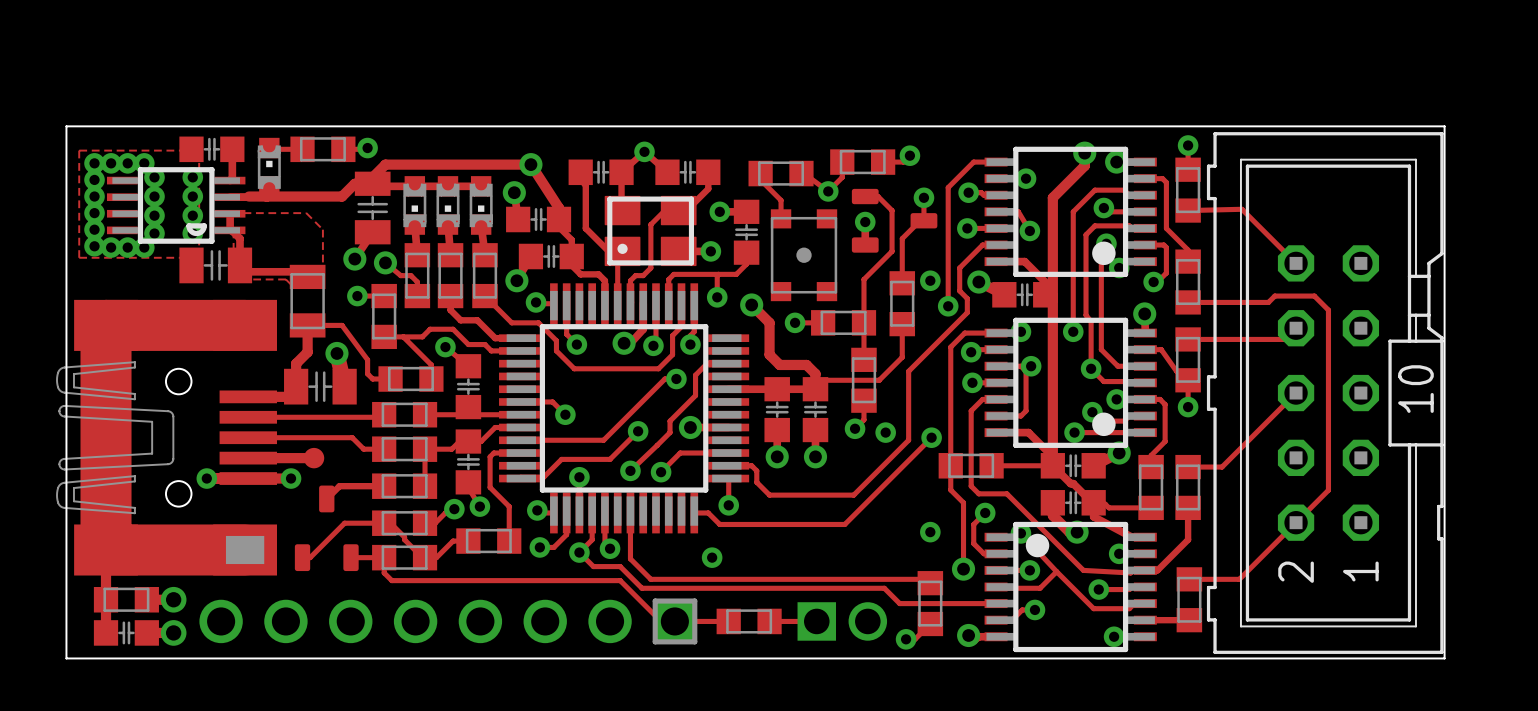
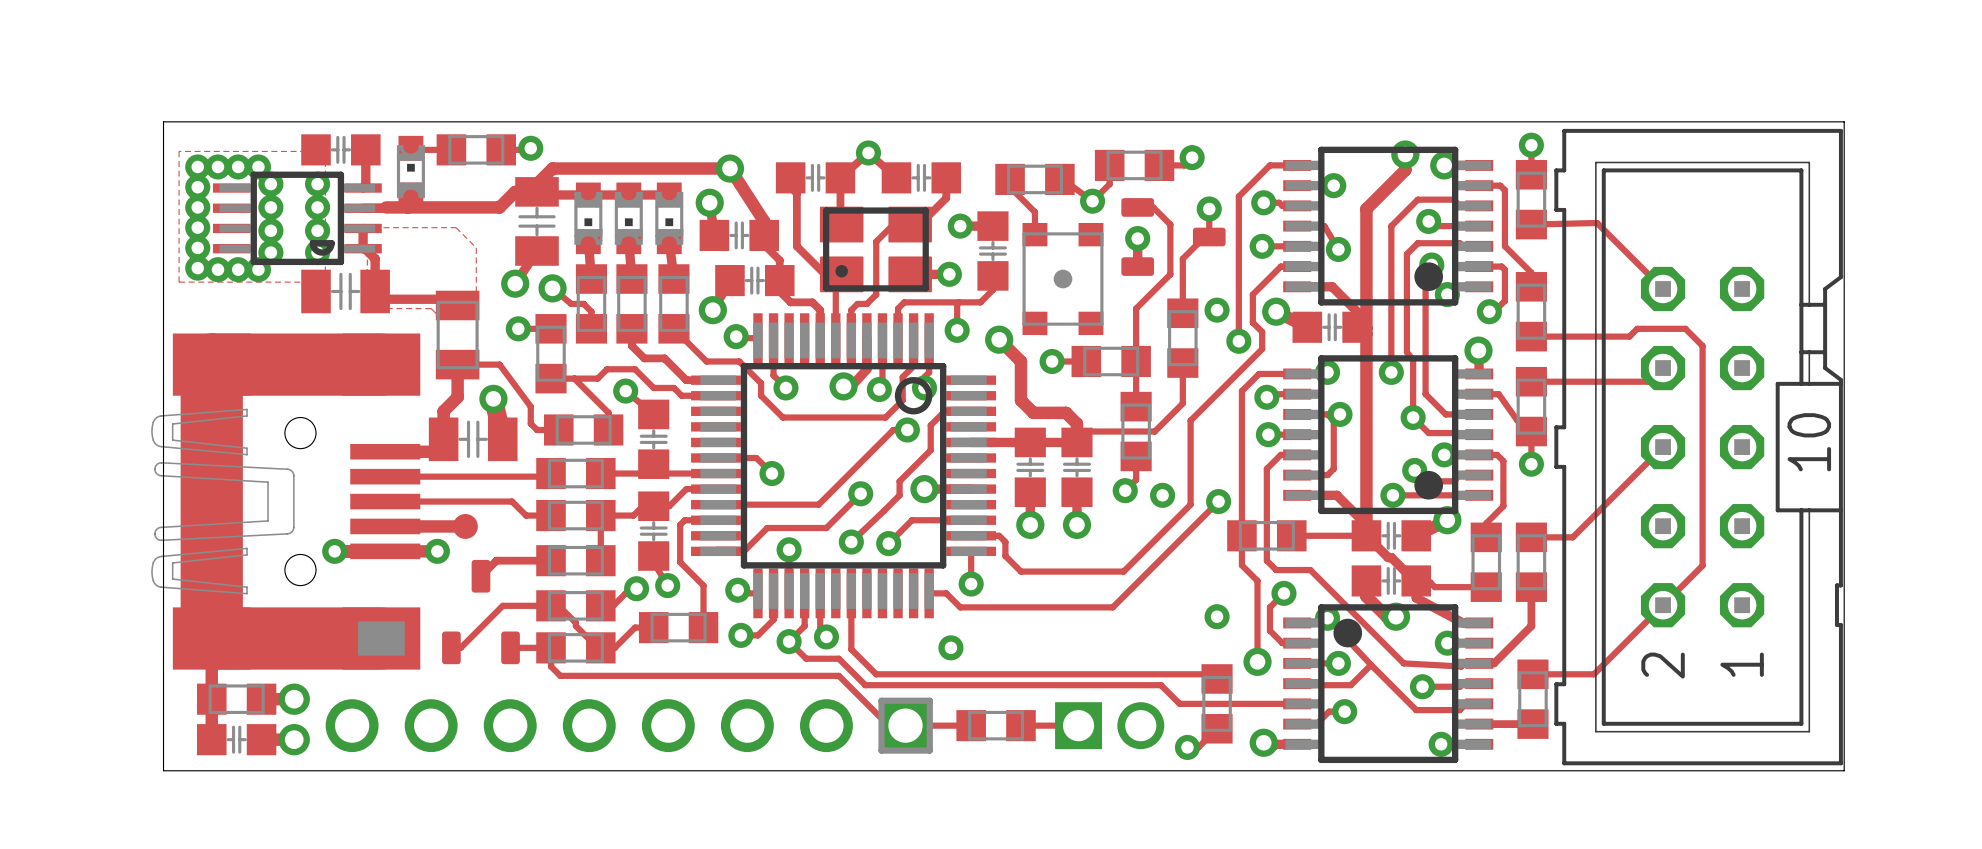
part footprint: [499, 283, 750, 534] -> [691, 313, 997, 619]

